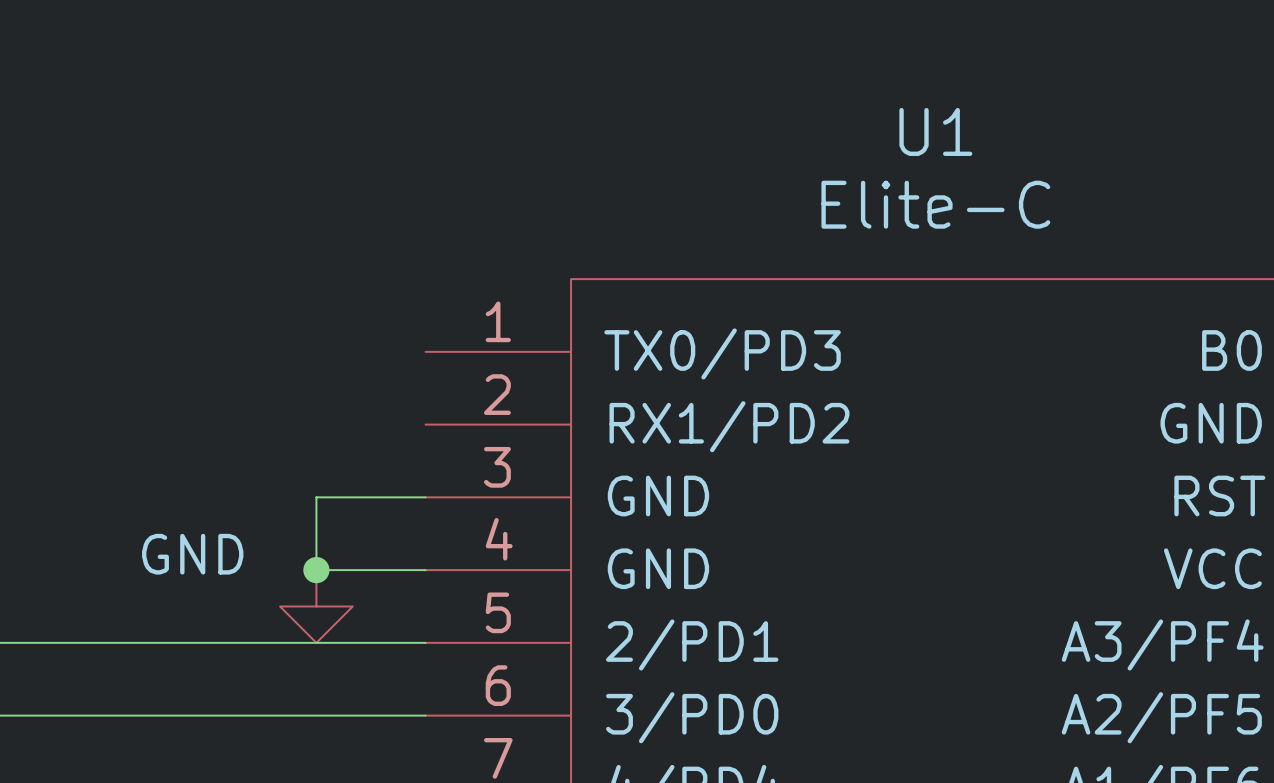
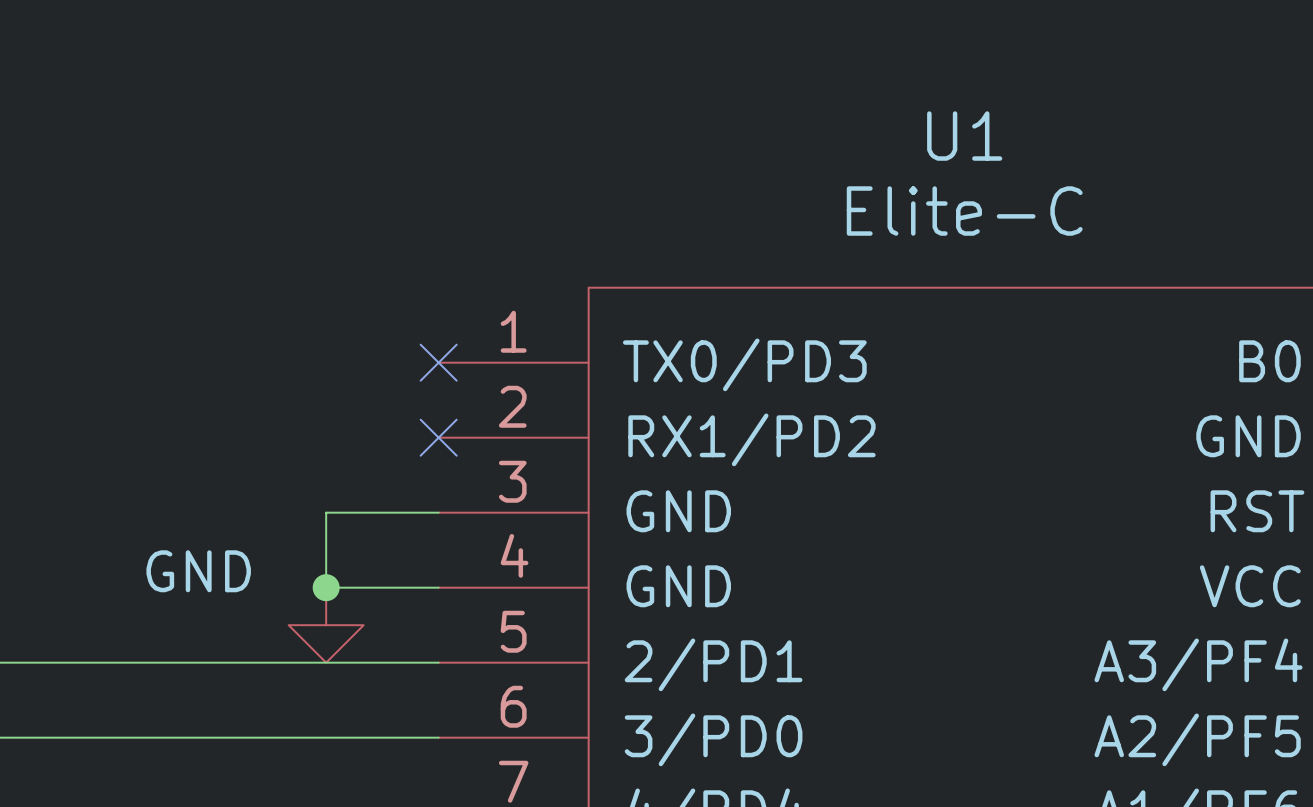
no-connect mark: none -> (438, 362)
no-connect mark: none -> (438, 437)

